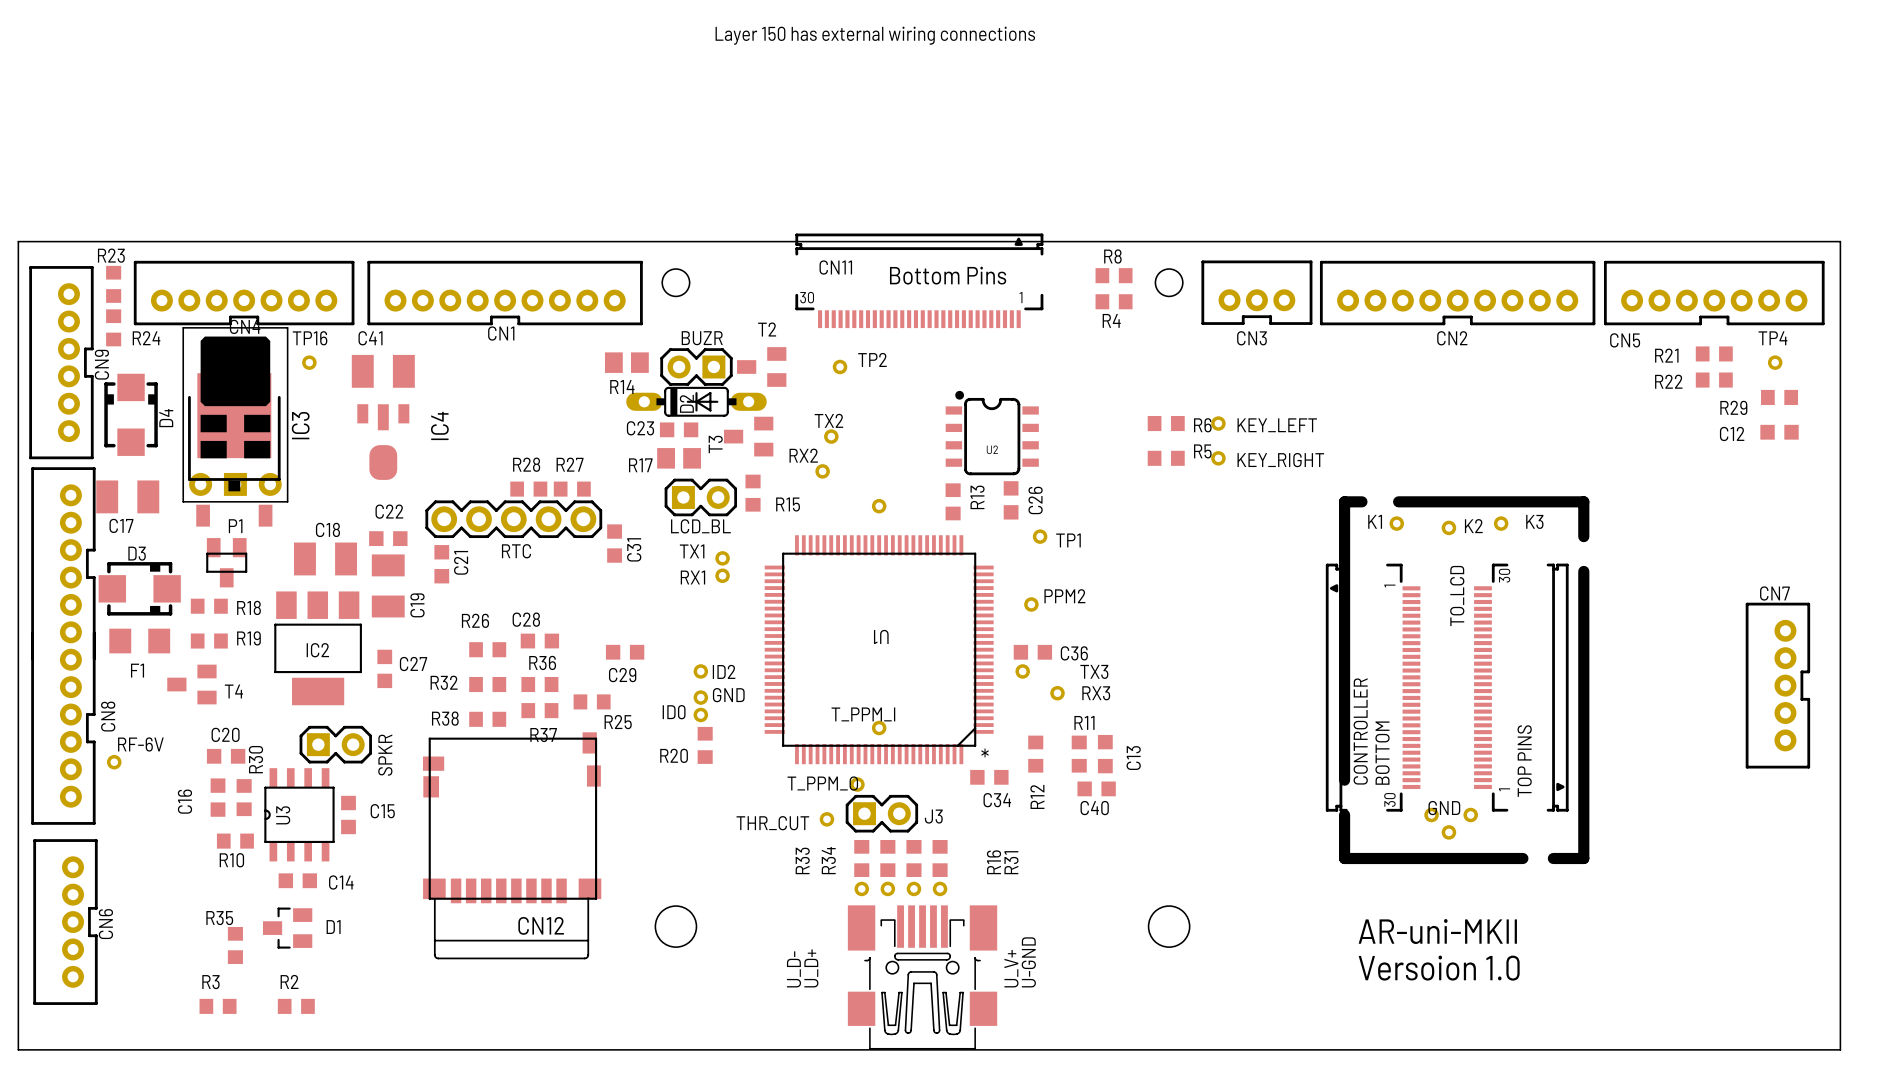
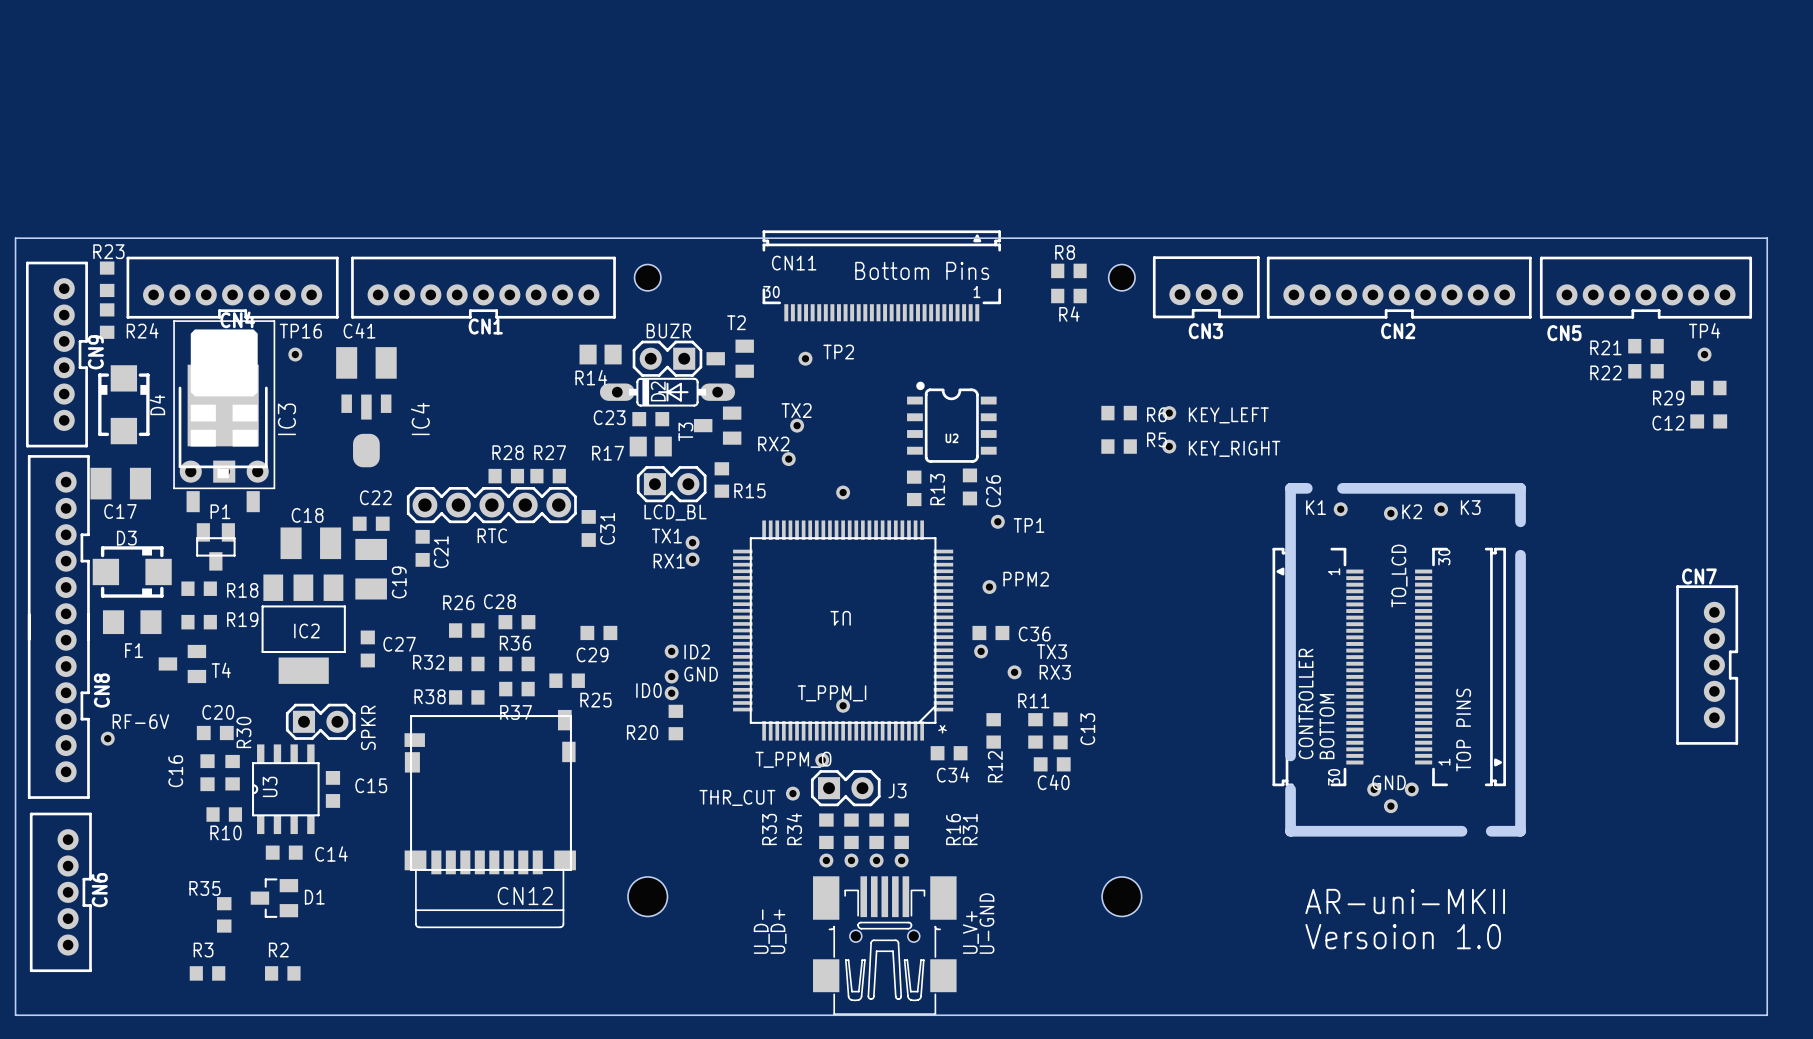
text: Layer 150 has external wiring connections (875, 35) -> none

